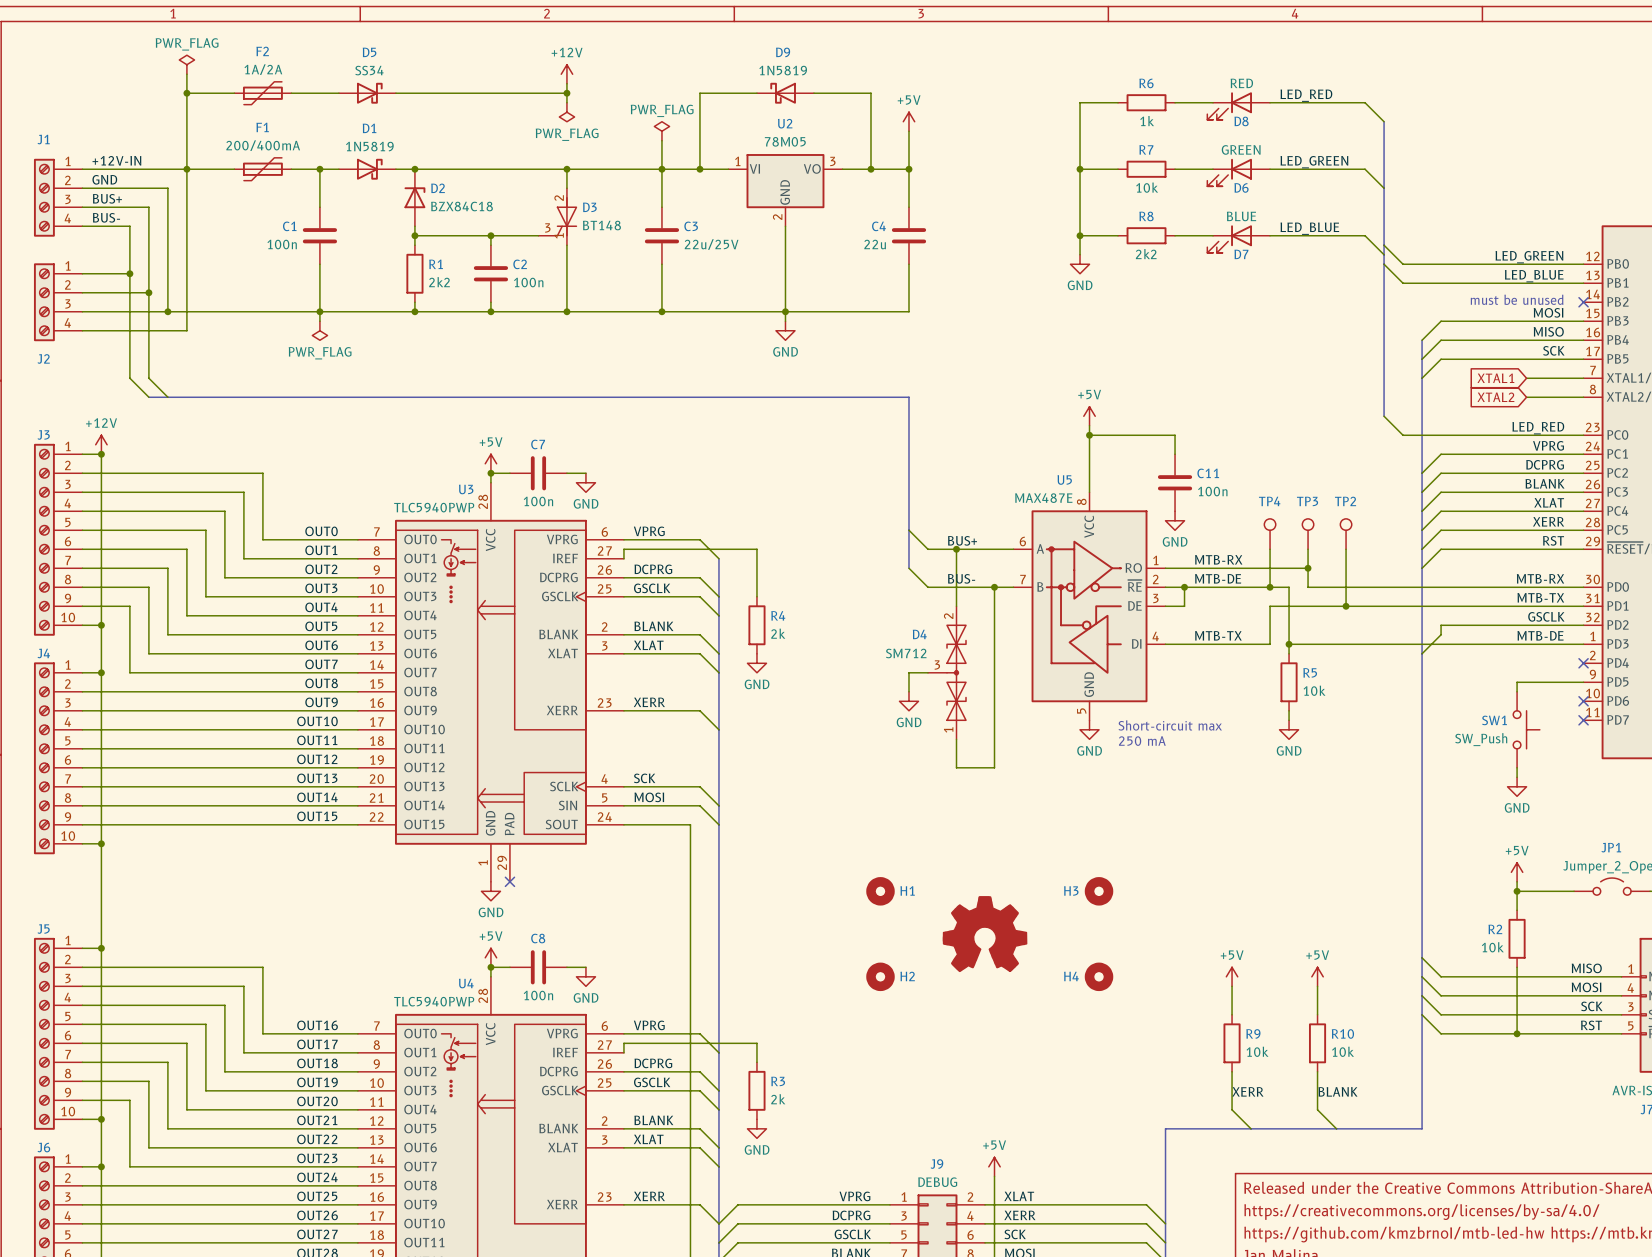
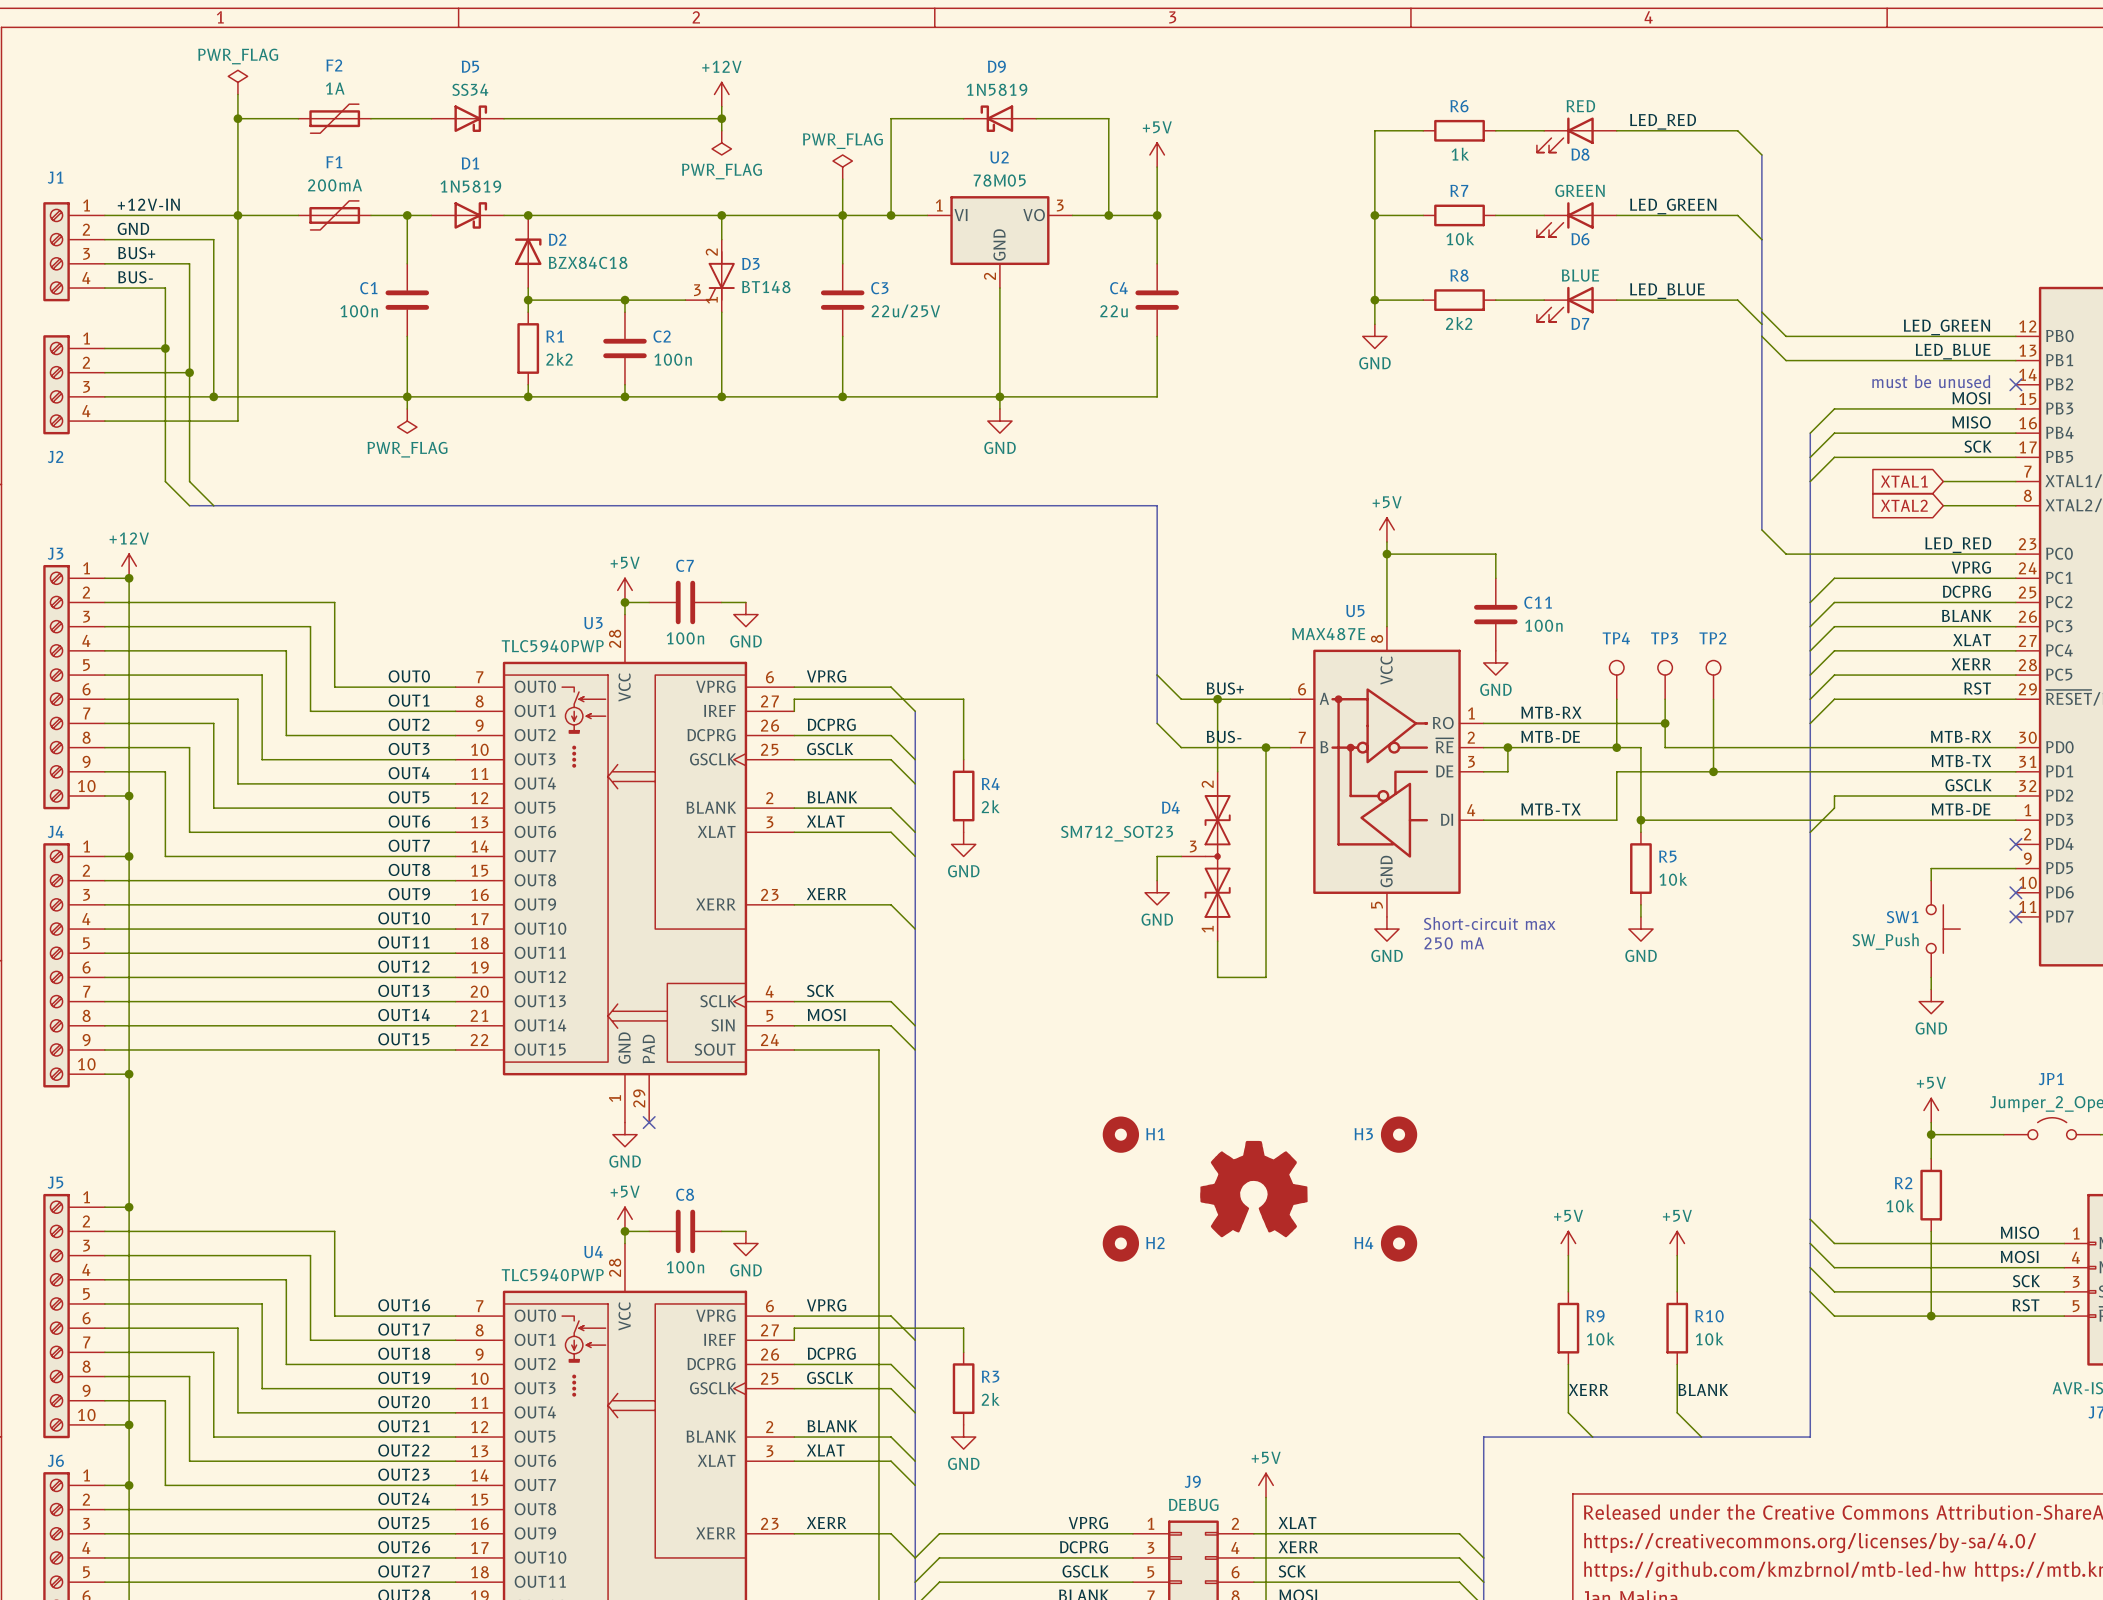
F2 value: 1A/2A (263, 69) -> 1A (335, 88)
F1 value: 200/400mA (263, 145) -> 200mA (335, 185)
D4 value: SM712 (906, 653) -> SM712_SOT23 (1117, 833)

